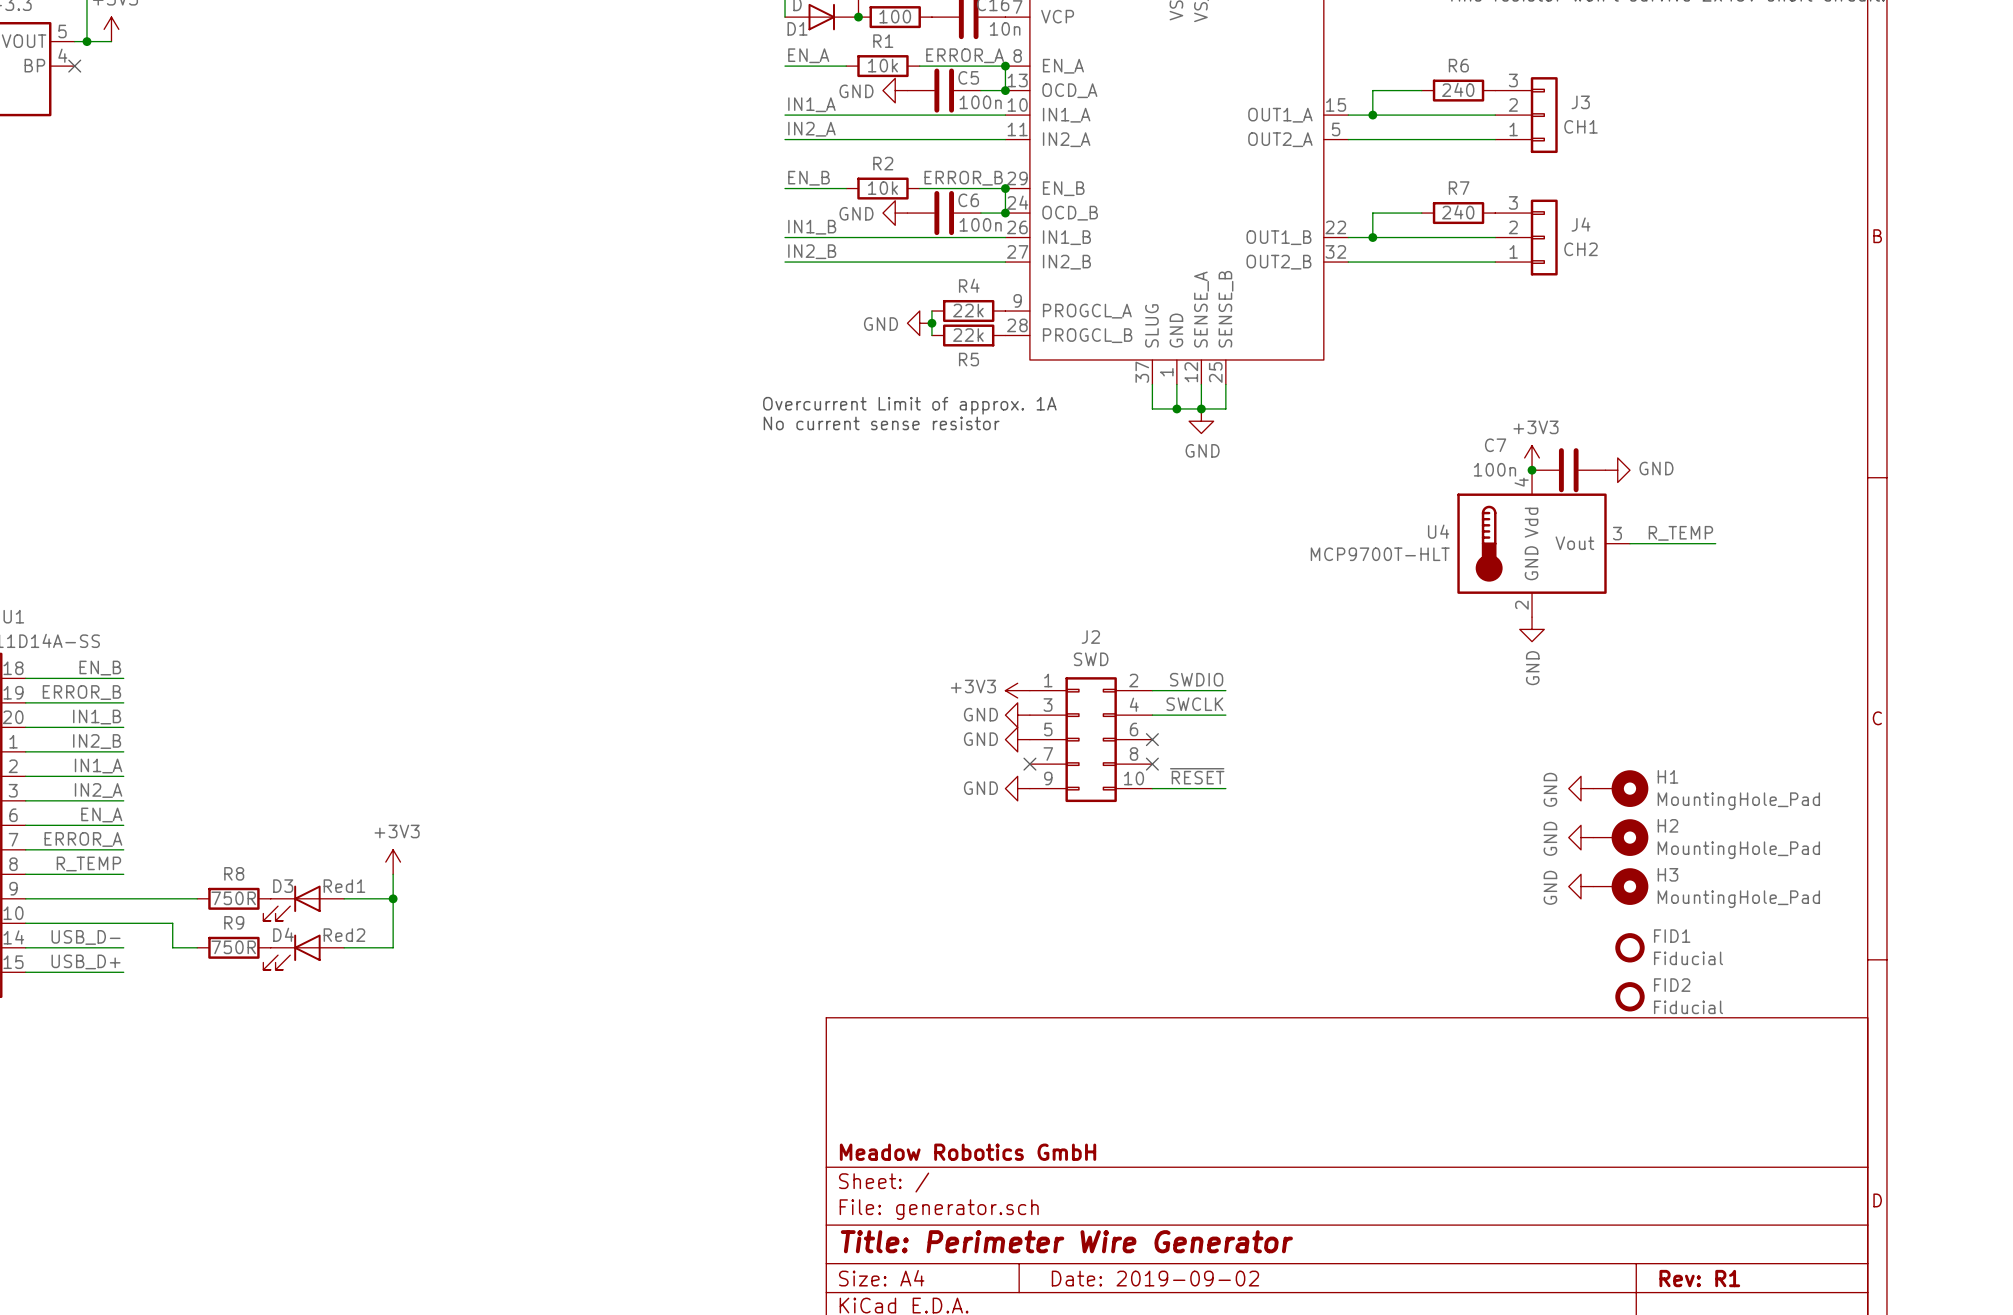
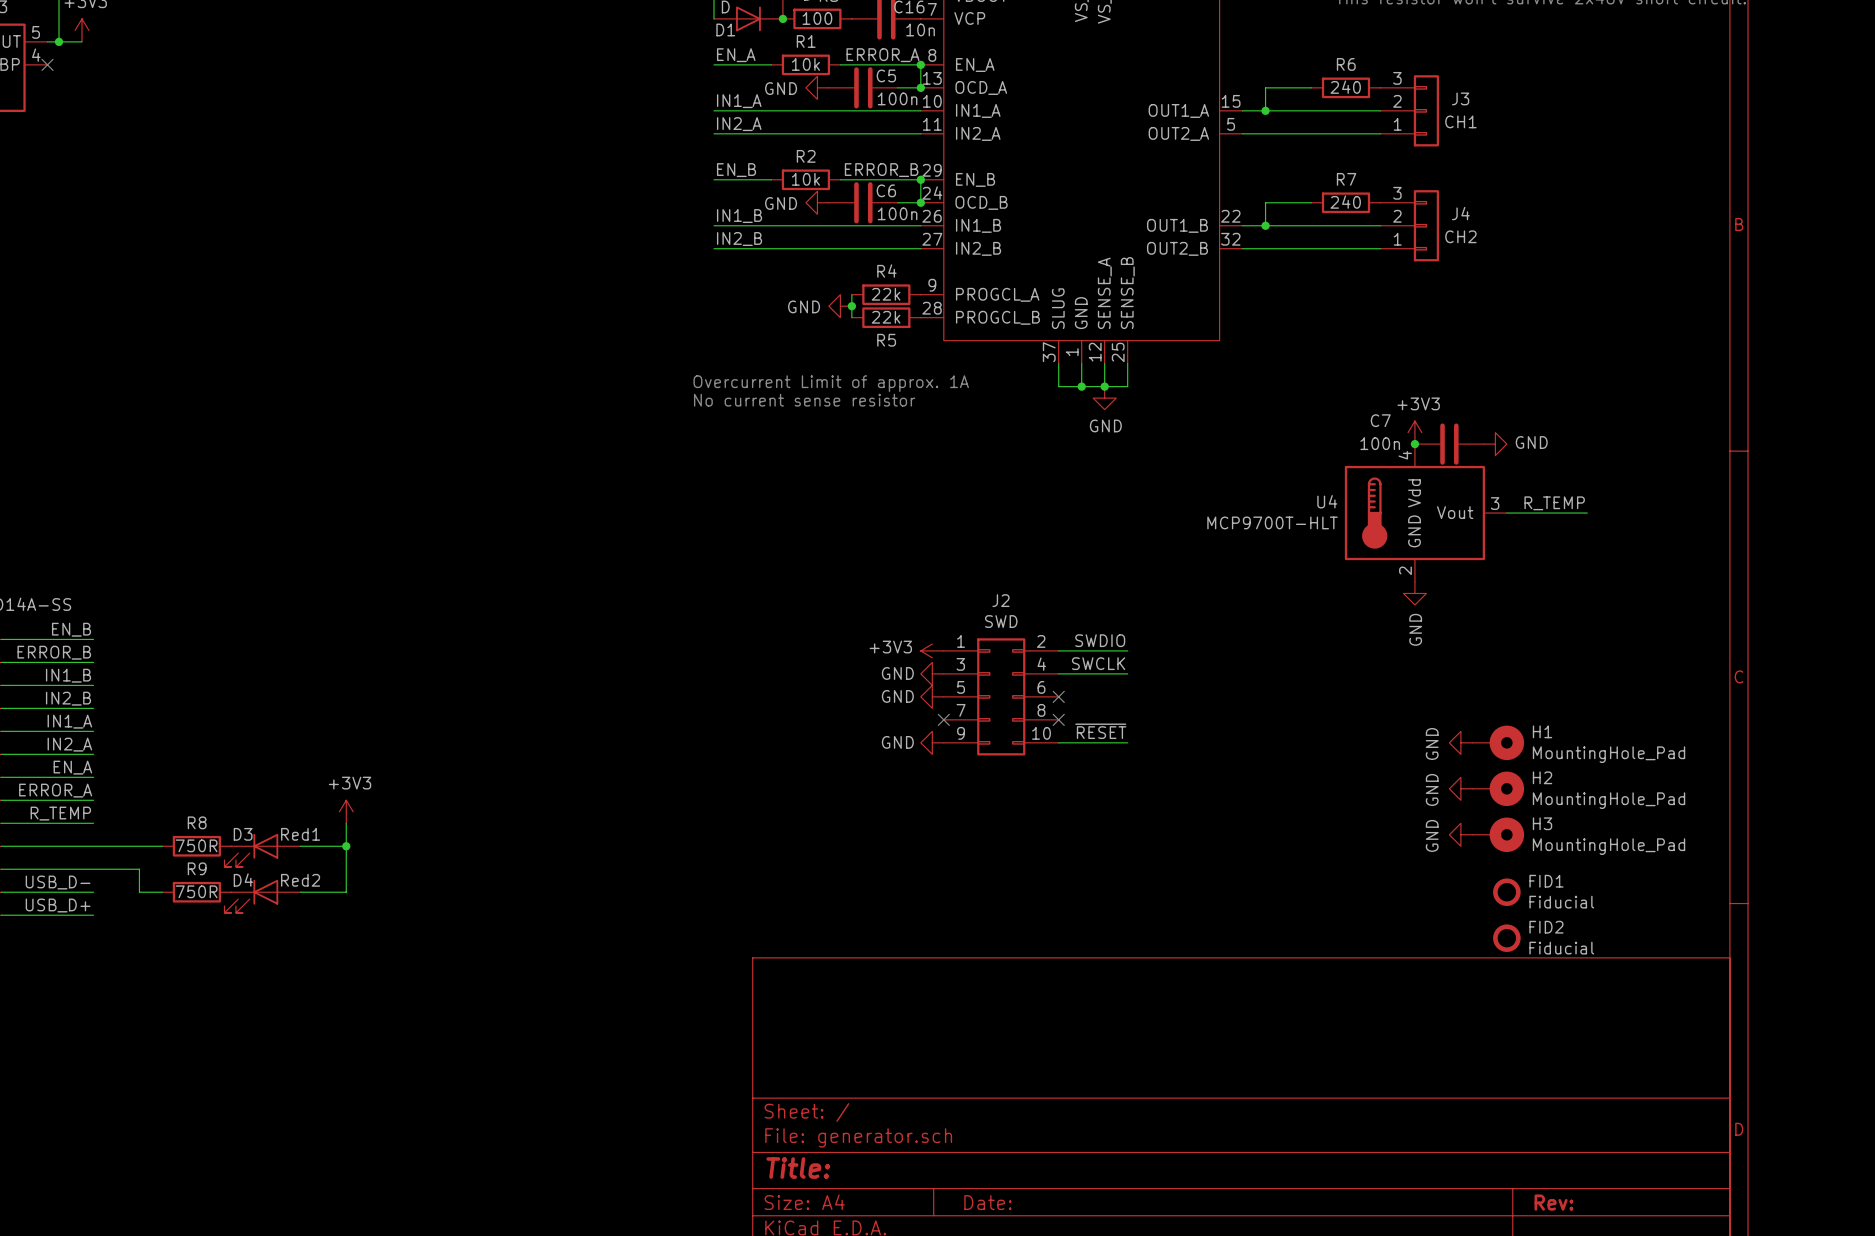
title block: Meadow Robotics GmbH (968, 1152) -> none
title block: Title: Perimeter Wire Generator (1066, 1241) -> Title: (798, 1168)
title block: Date: 2019-09-02 (1155, 1278) -> Date: (987, 1202)
title block: Rev: R1 (1699, 1278) -> Rev: (1553, 1202)

